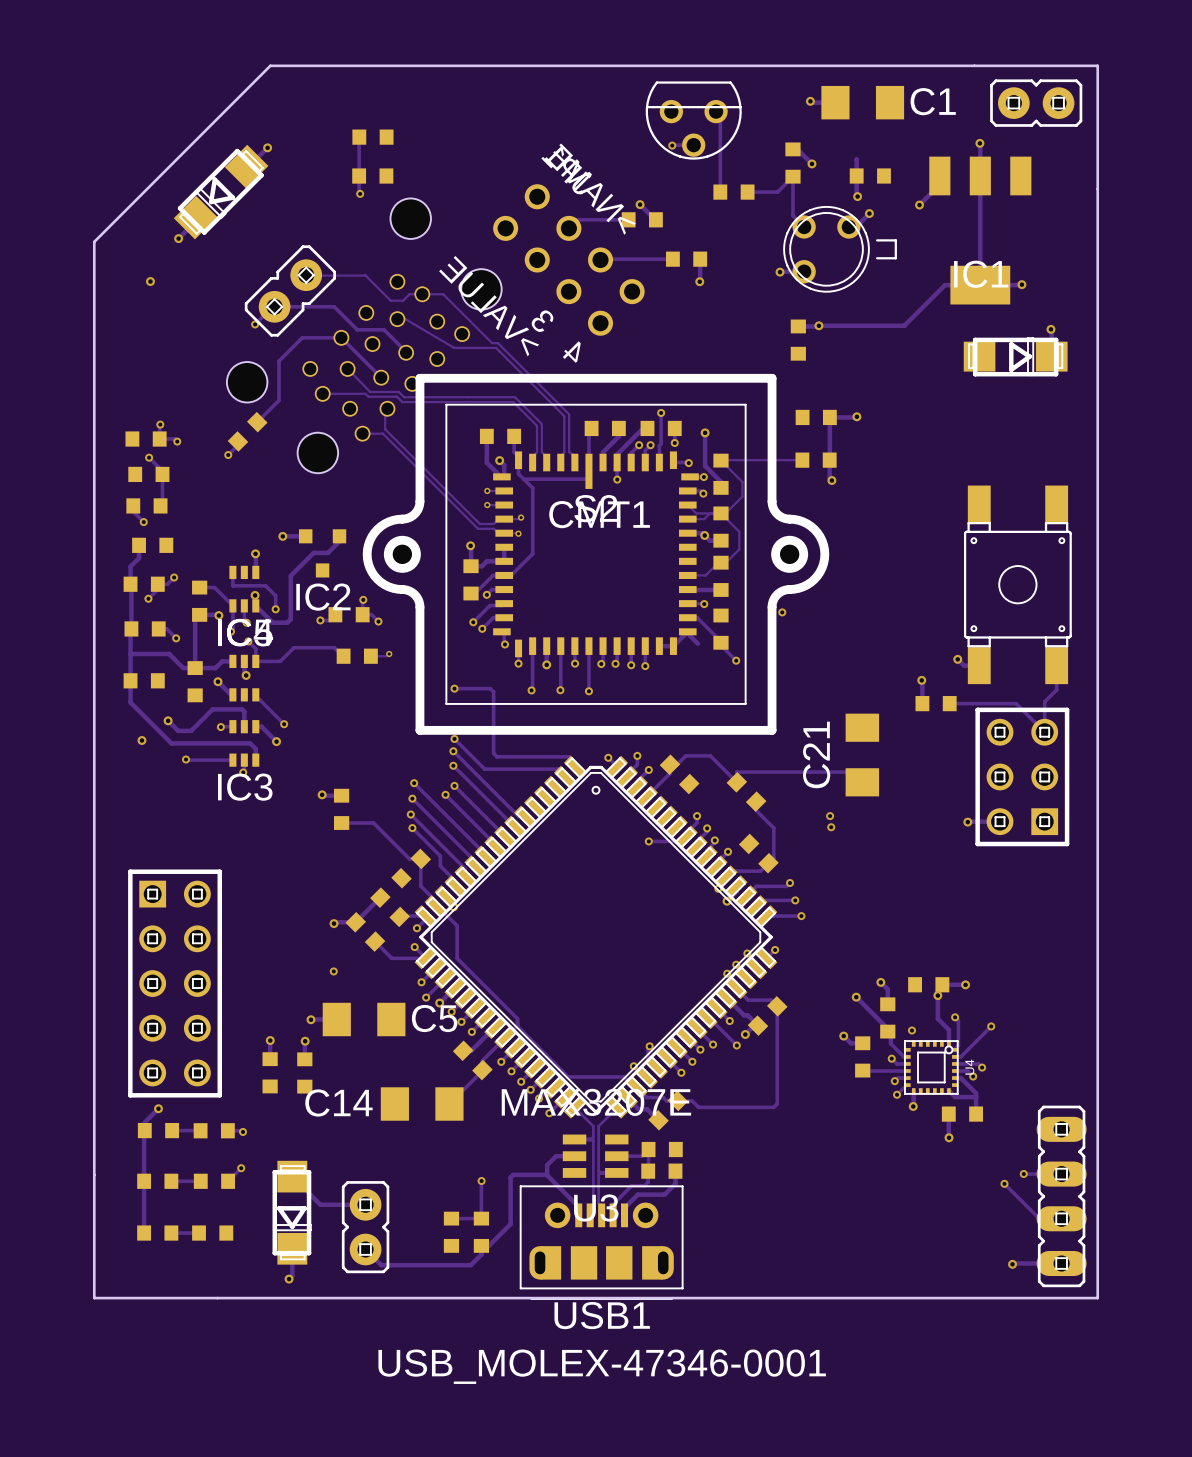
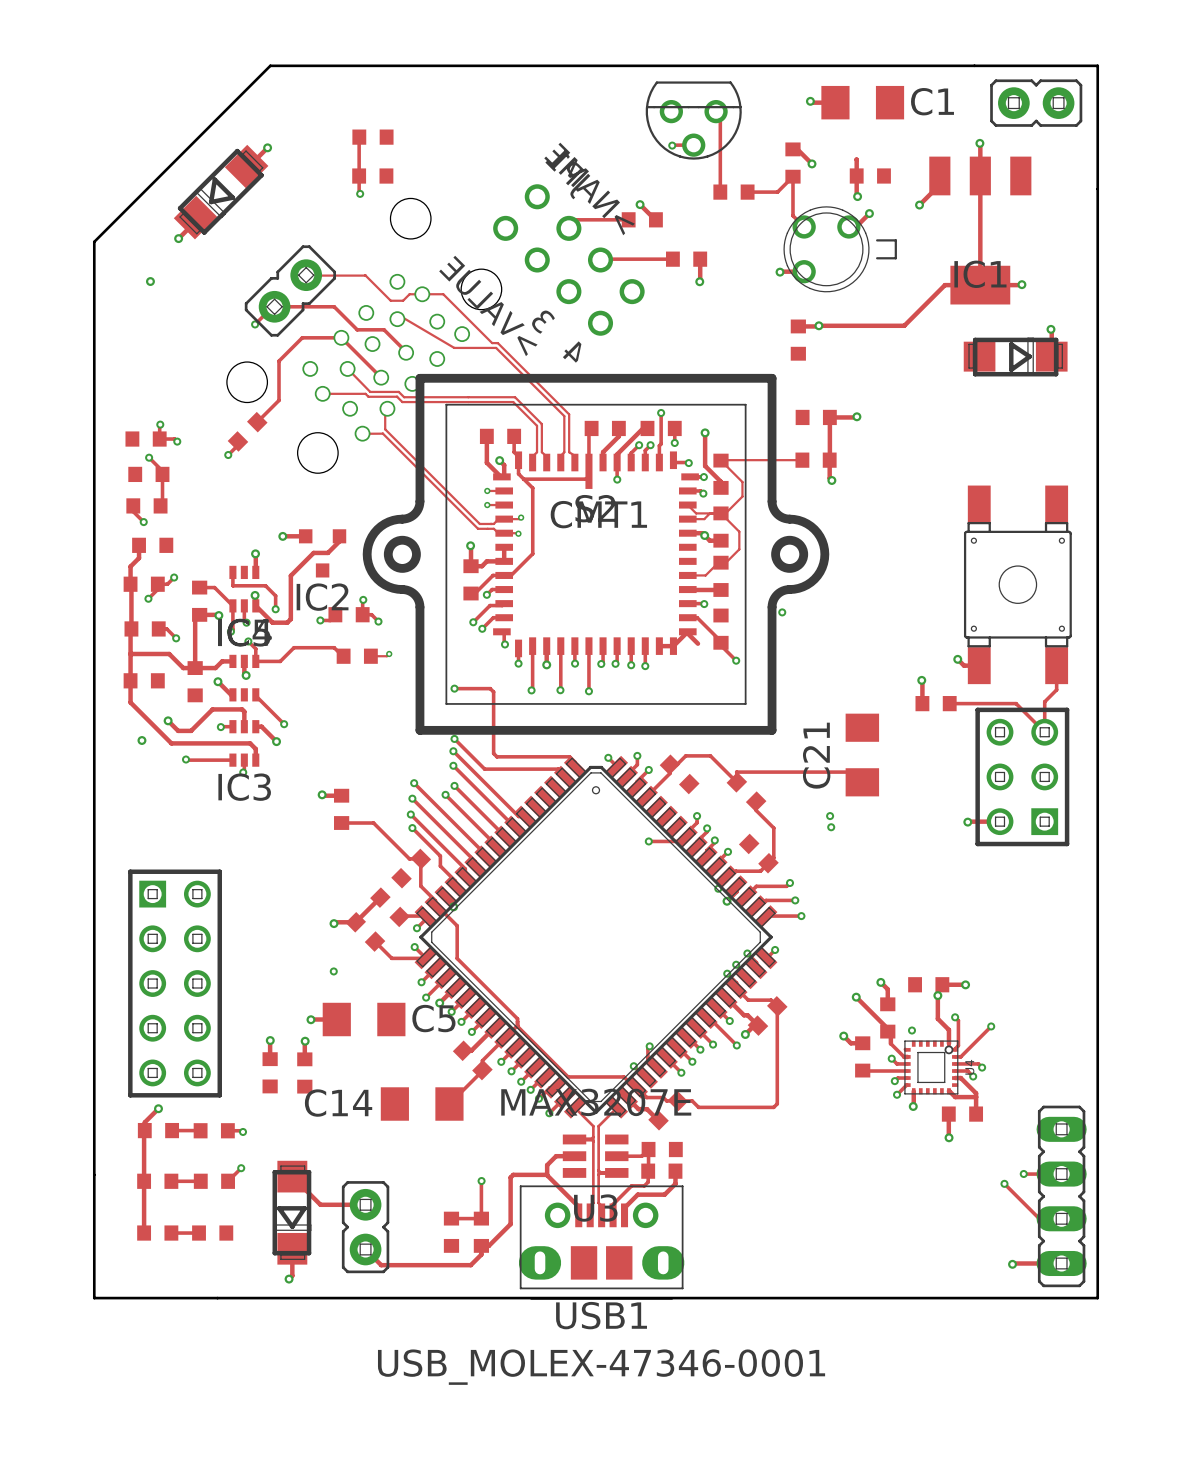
USB1 footprint: [519, 1185, 684, 1300] -> [518, 1185, 685, 1300]

